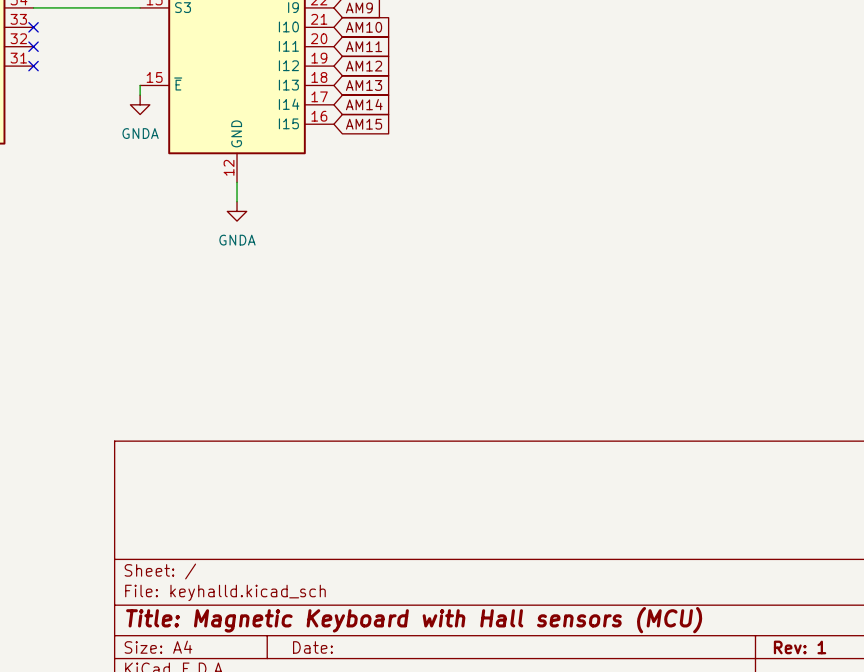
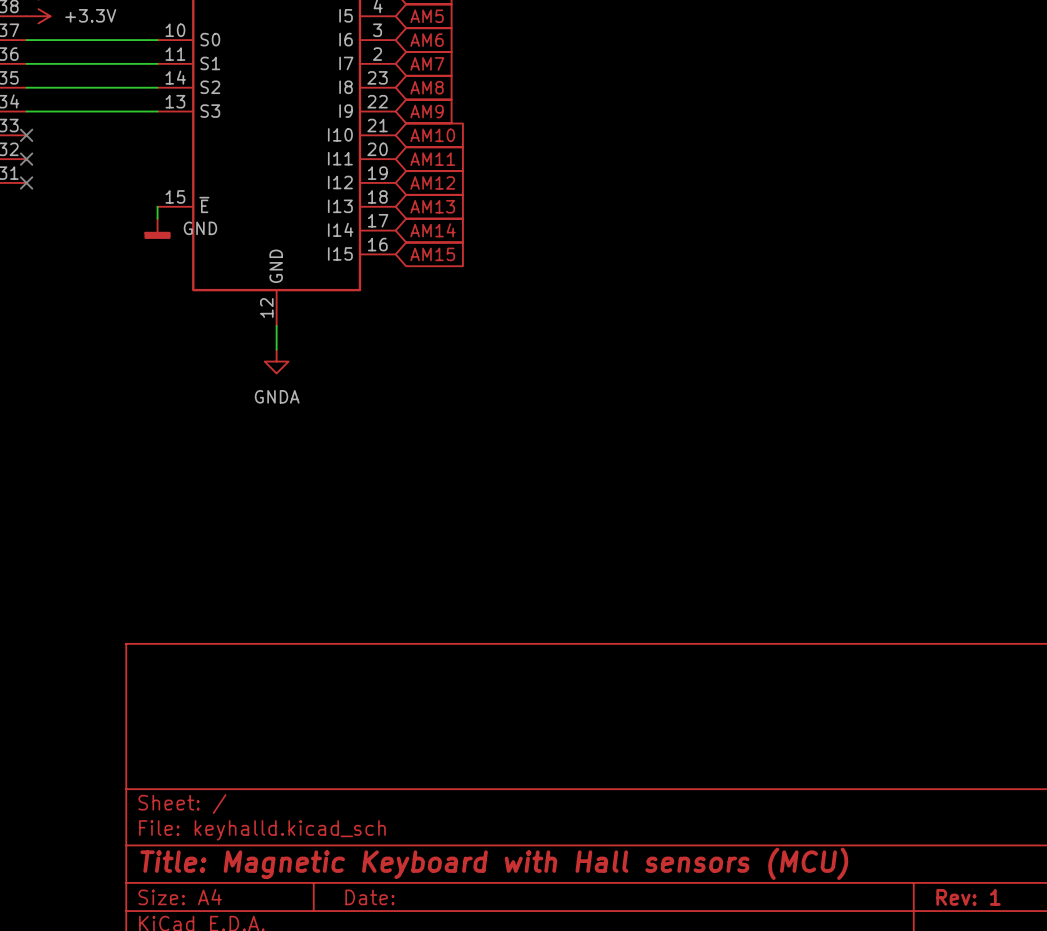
power symbol: GNDA (140, 104) -> GND (157, 228)

